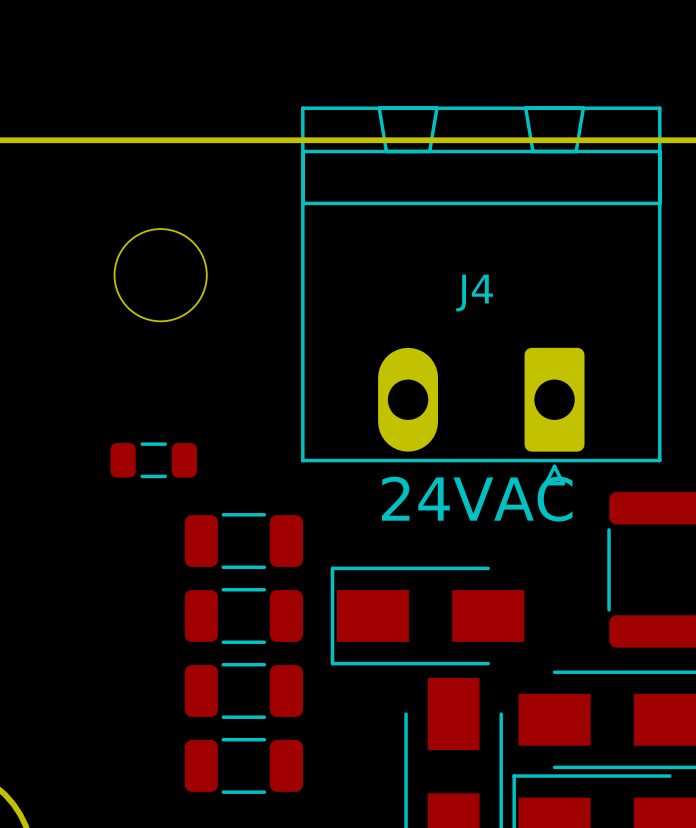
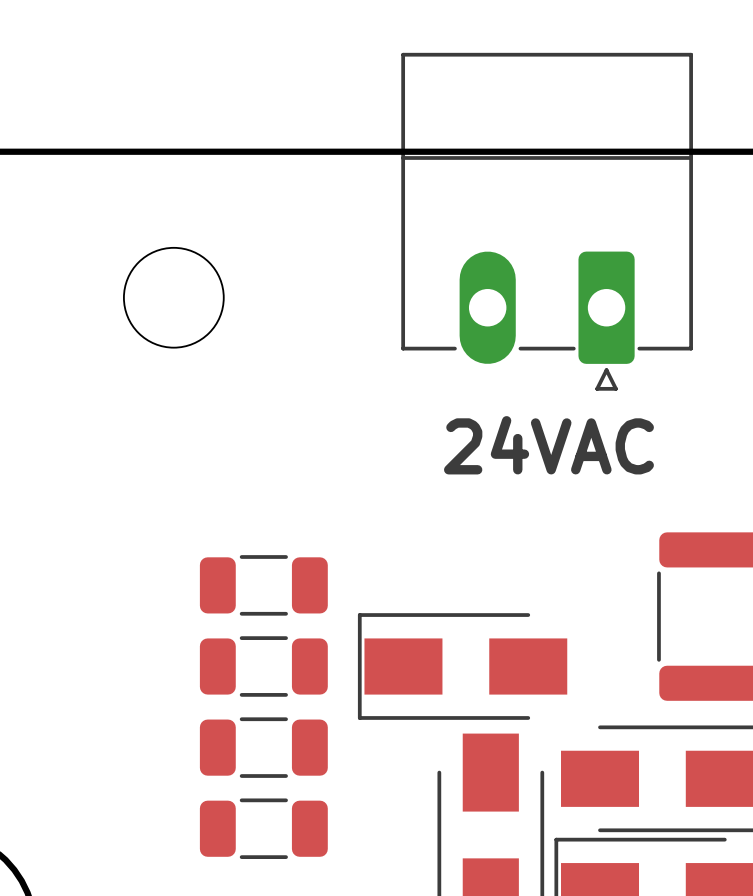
part: none -> (547, 221)
J4: (481, 295) -> none
part: (153, 460) -> none
text position: 24VAC (477, 499) -> 24VAC (548, 445)

